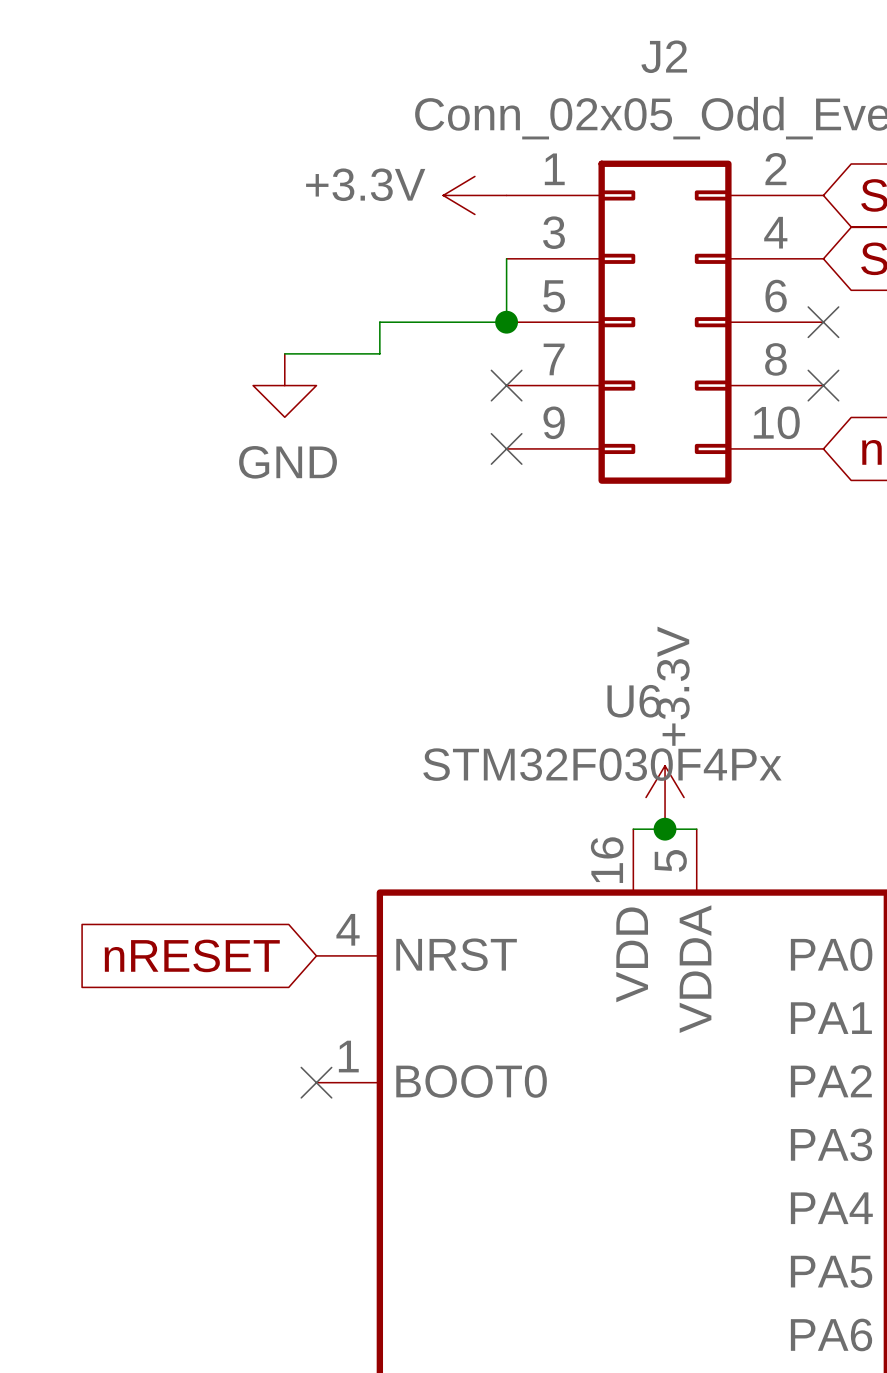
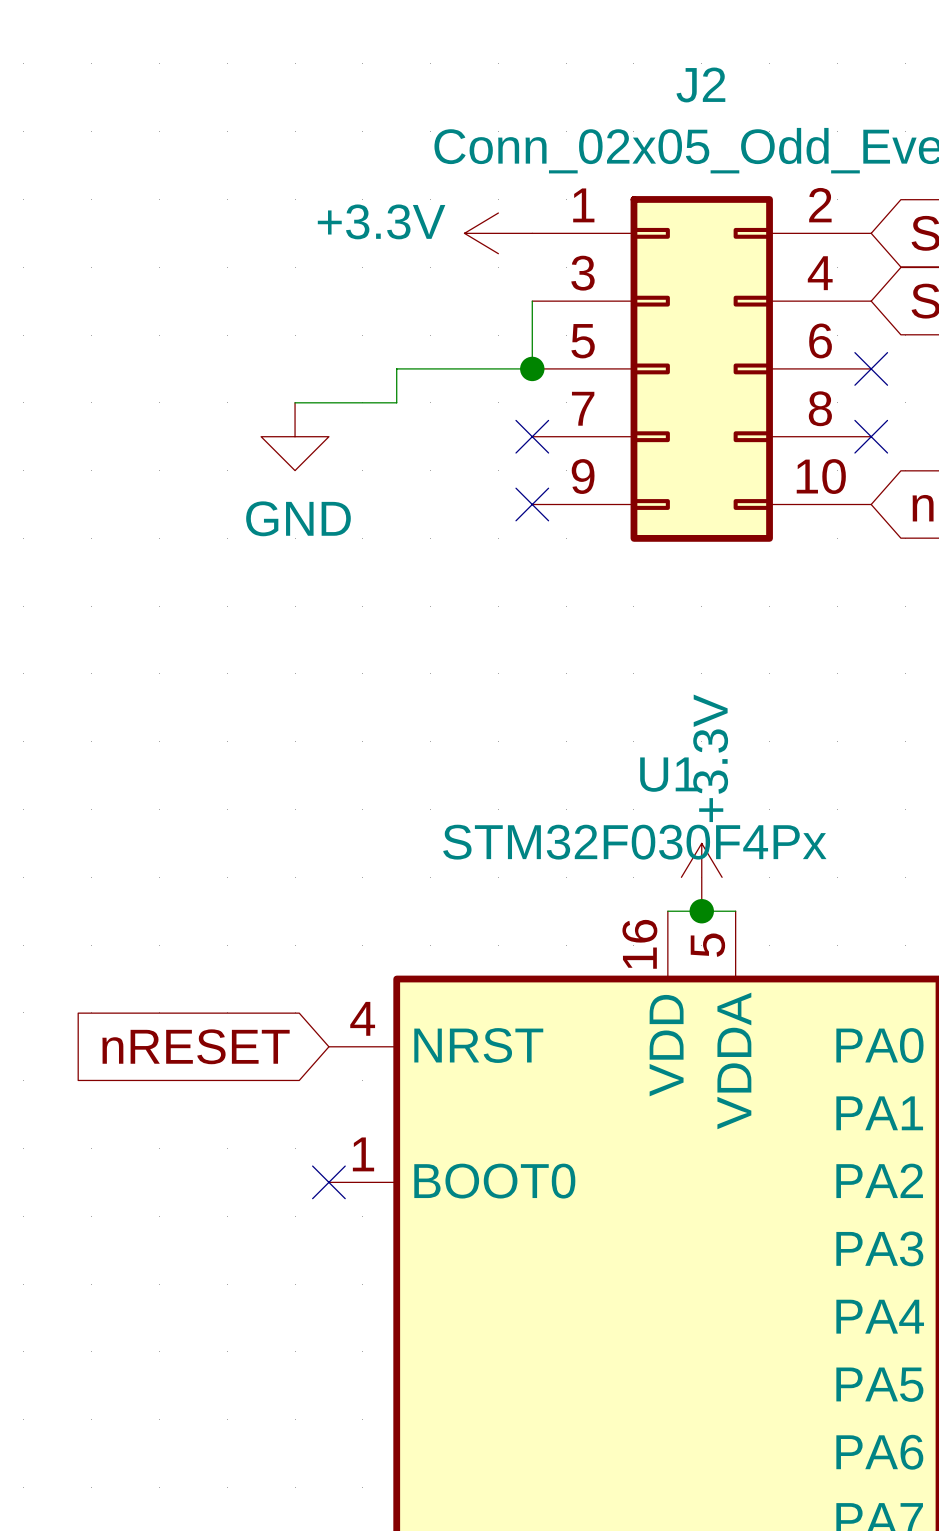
U6 name: U6 (634, 701) -> U1 (668, 774)

